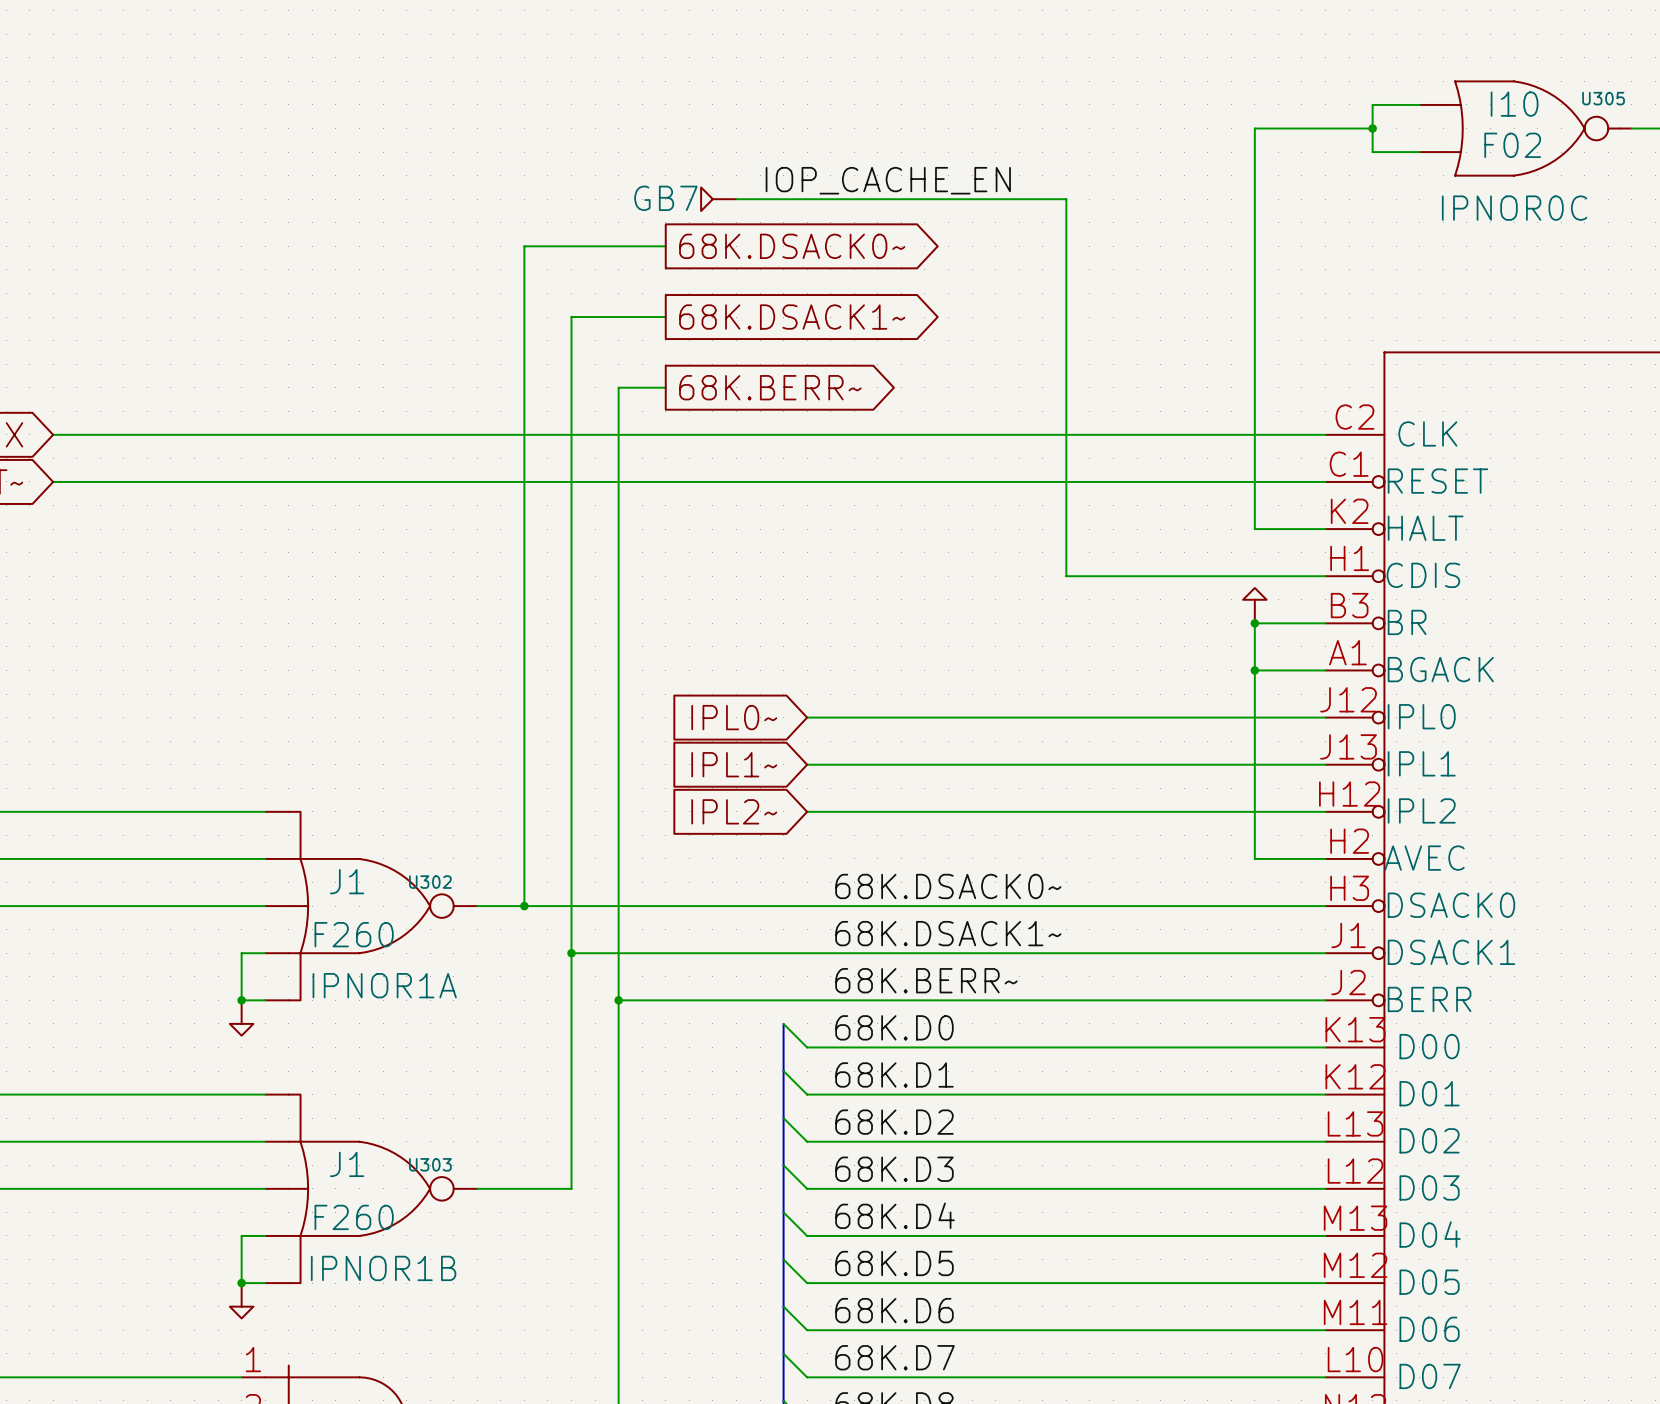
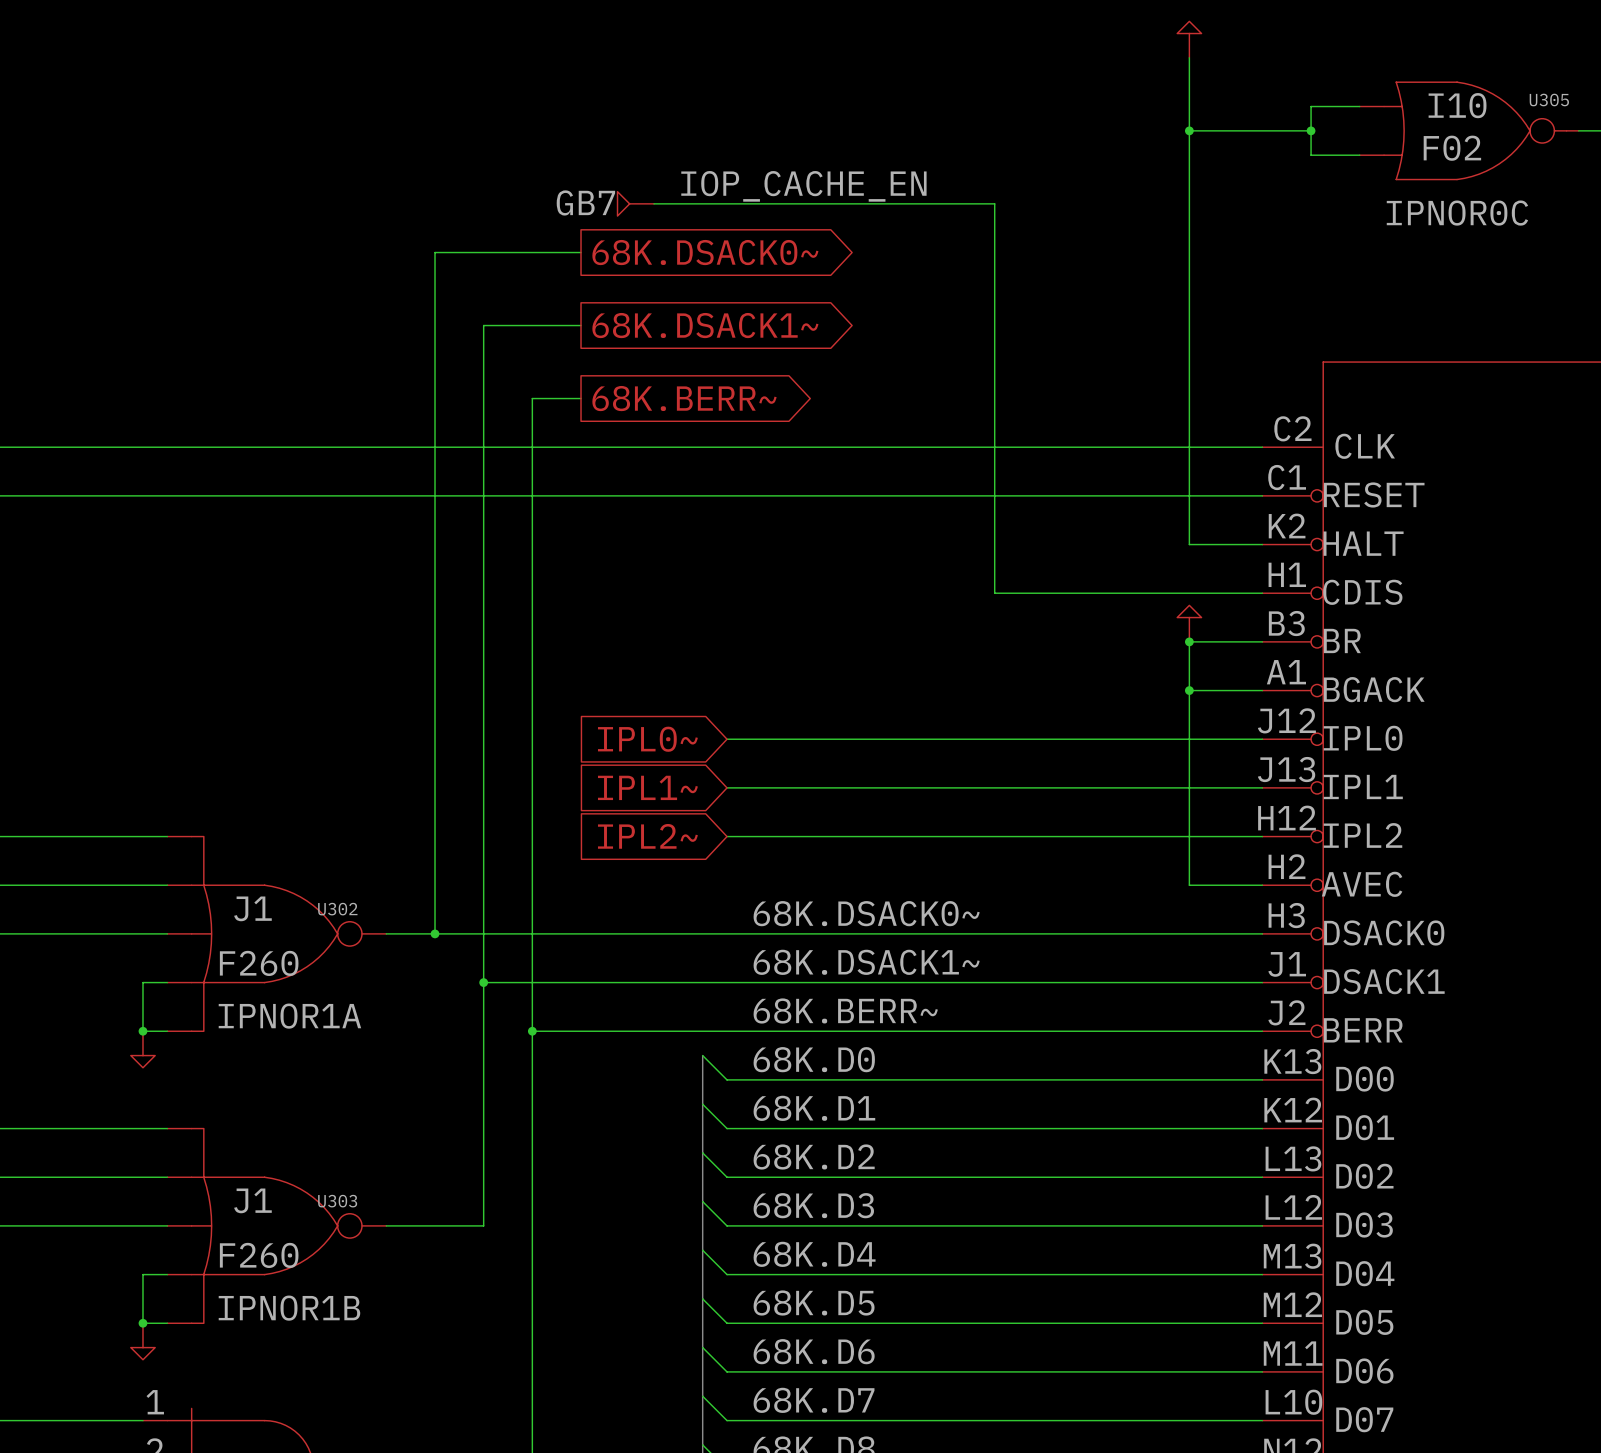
power symbol: none -> (1189, 39)
wire: none -> (1189, 57) (1189, 130)
junction: none -> (1189, 130)

